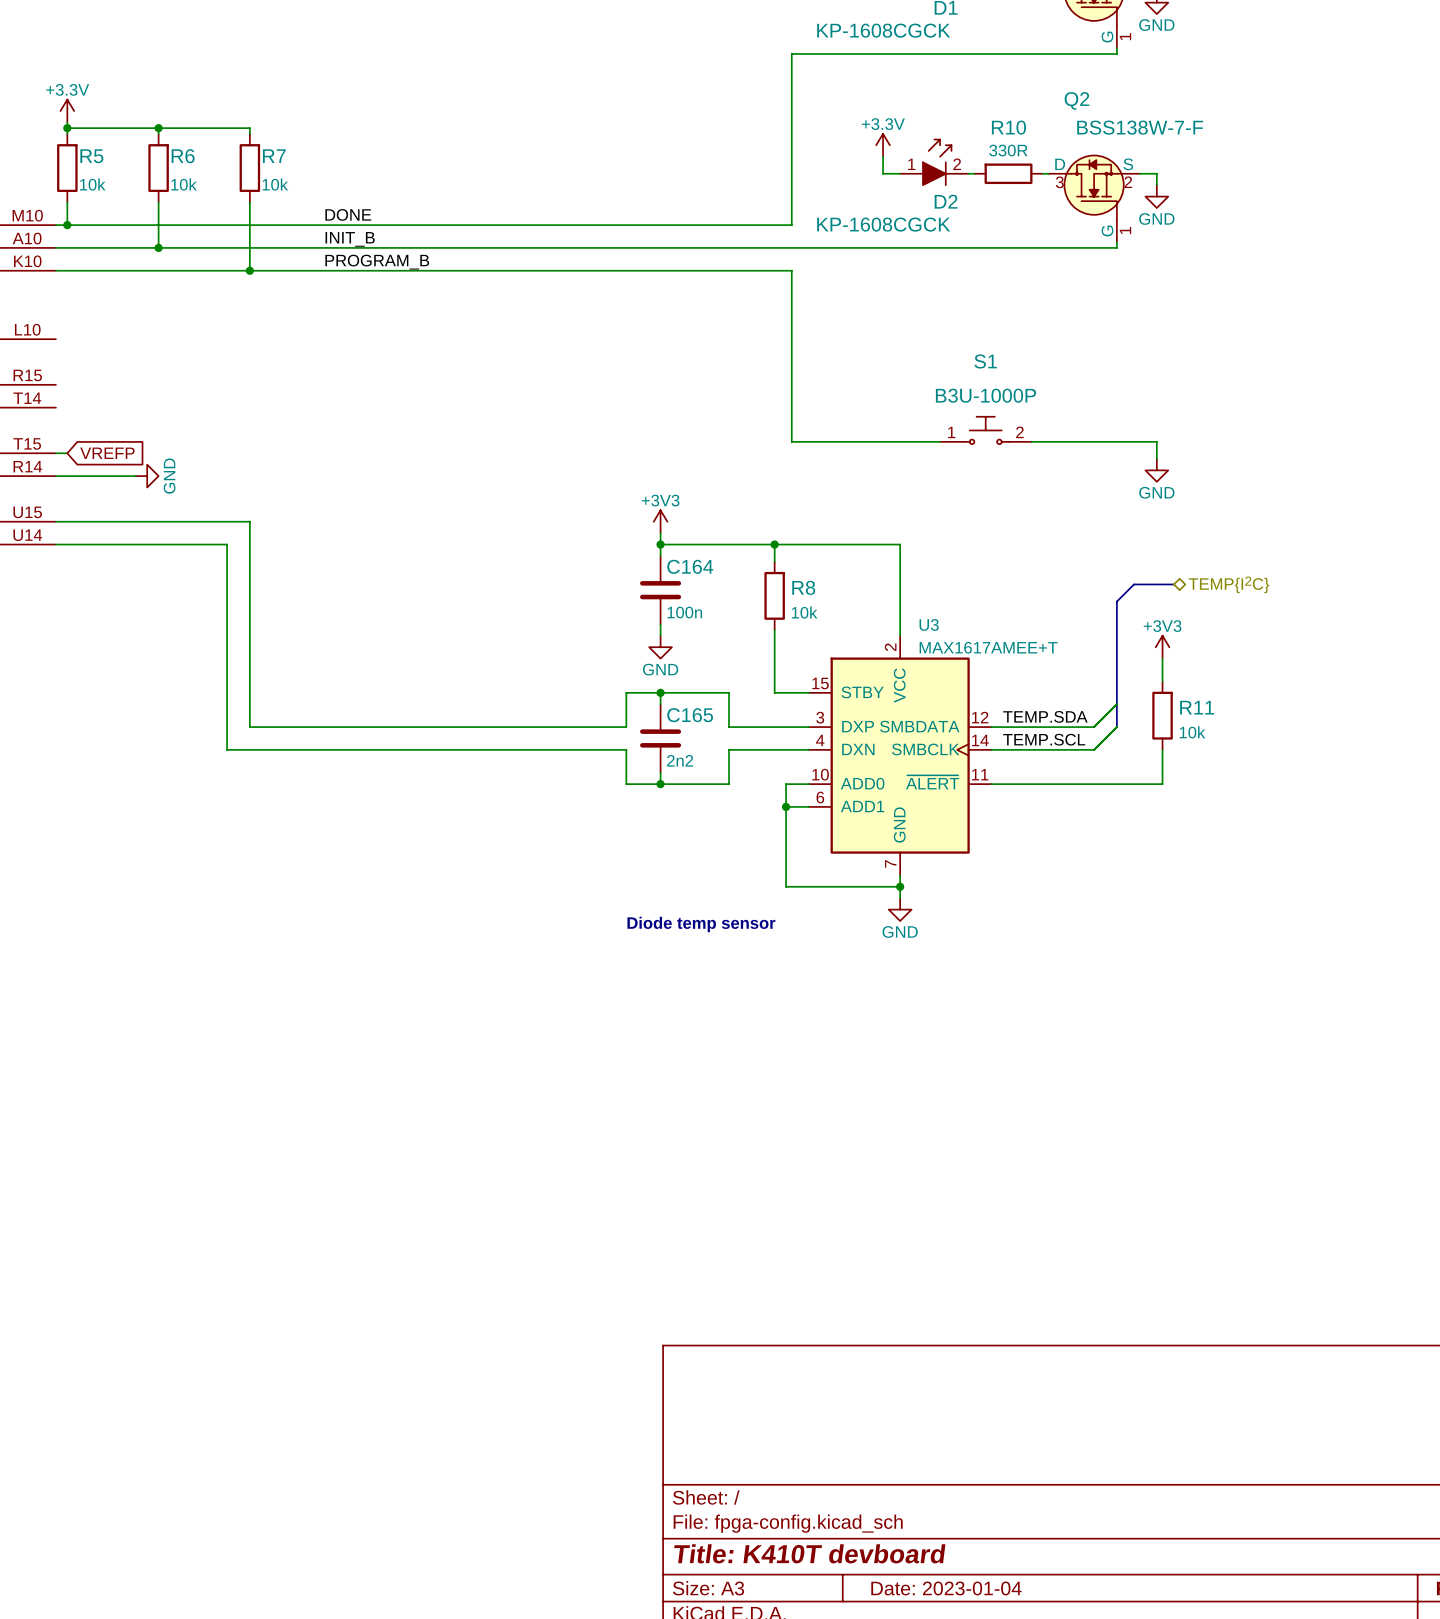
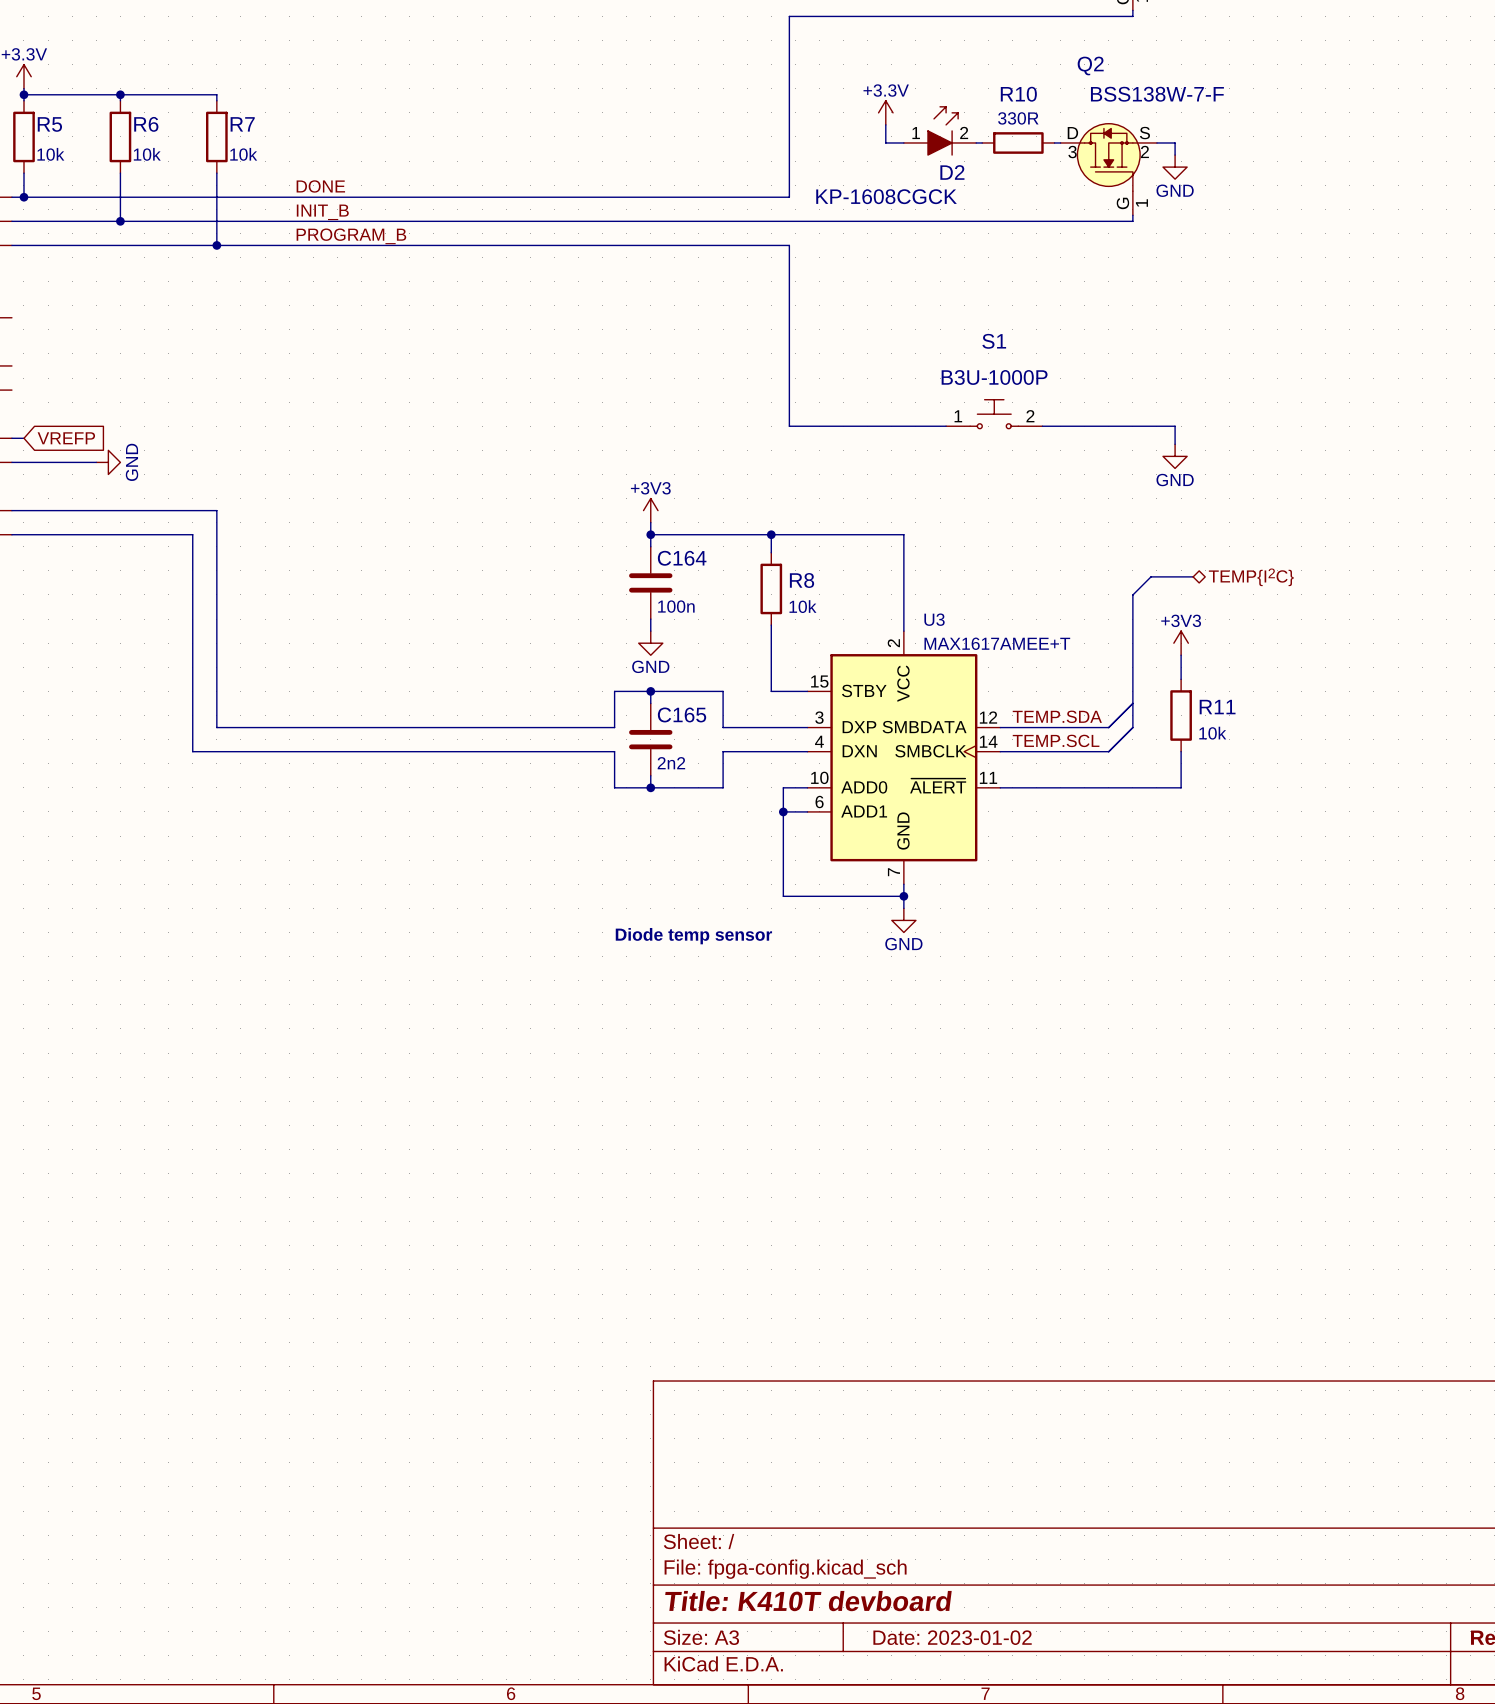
title block: Date: 2023-01-04 (946, 1588) -> Date: 2023-01-02 (952, 1637)

